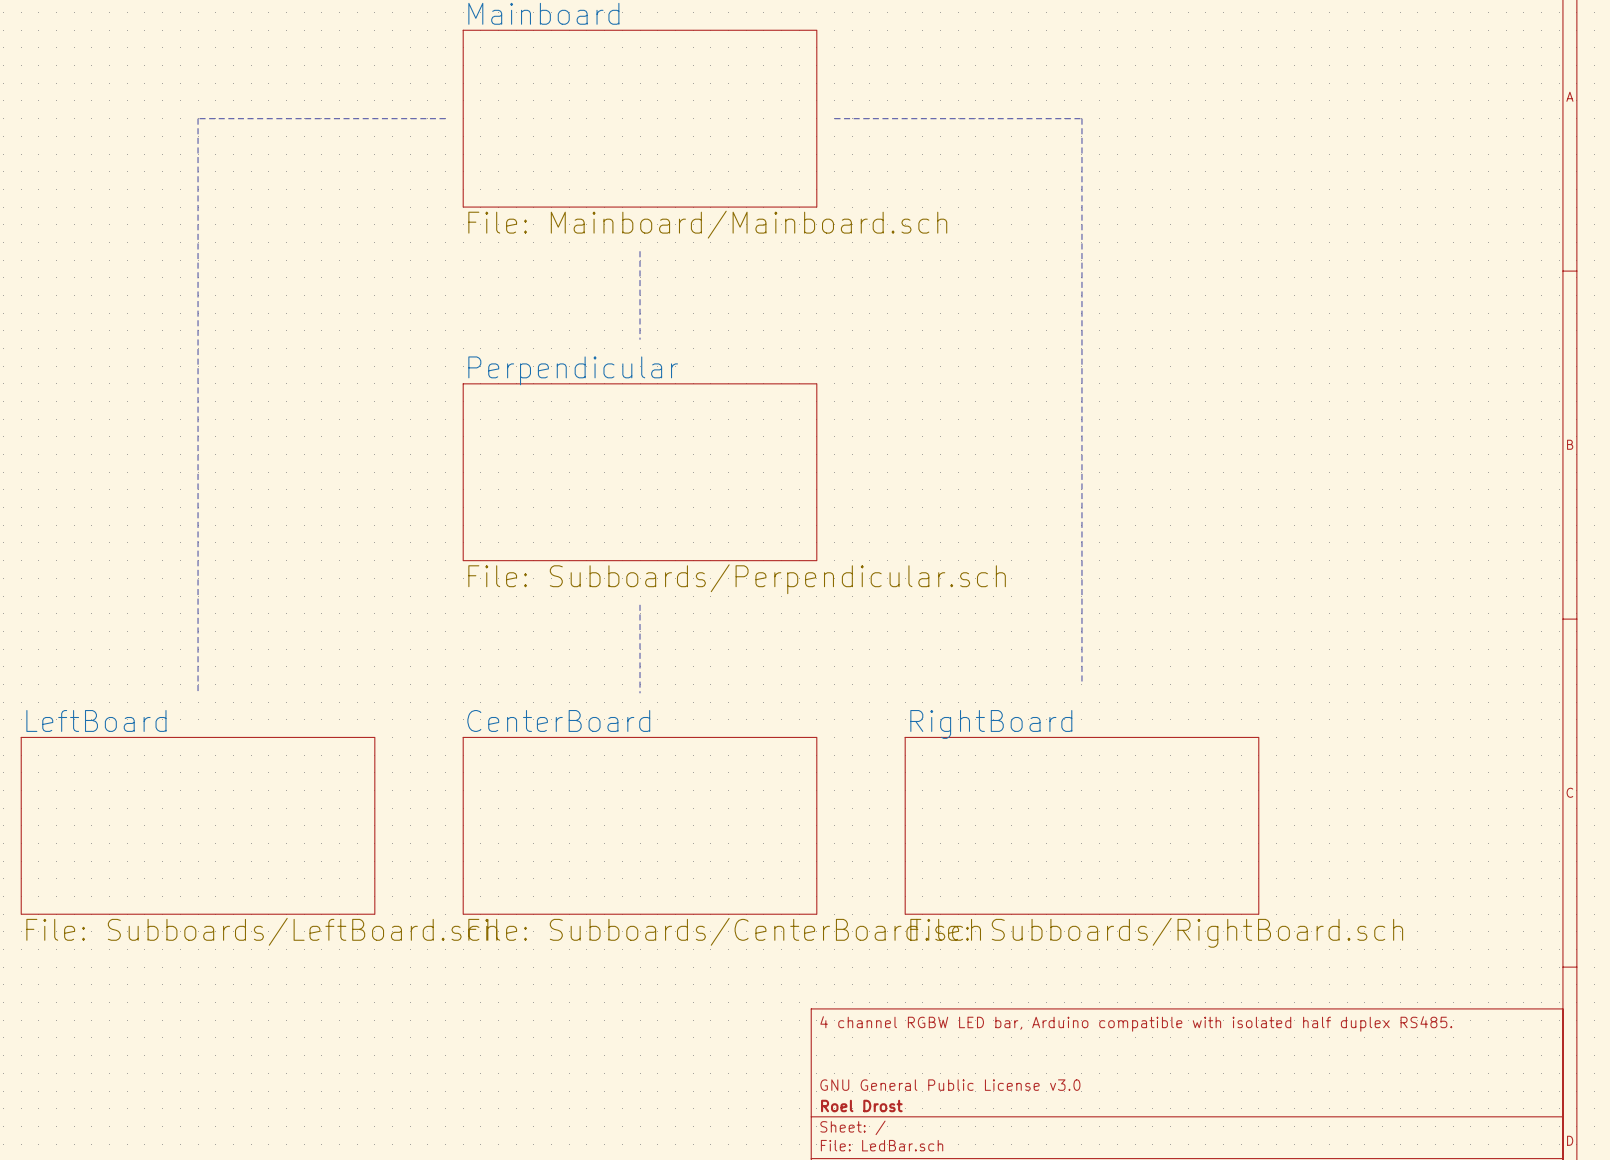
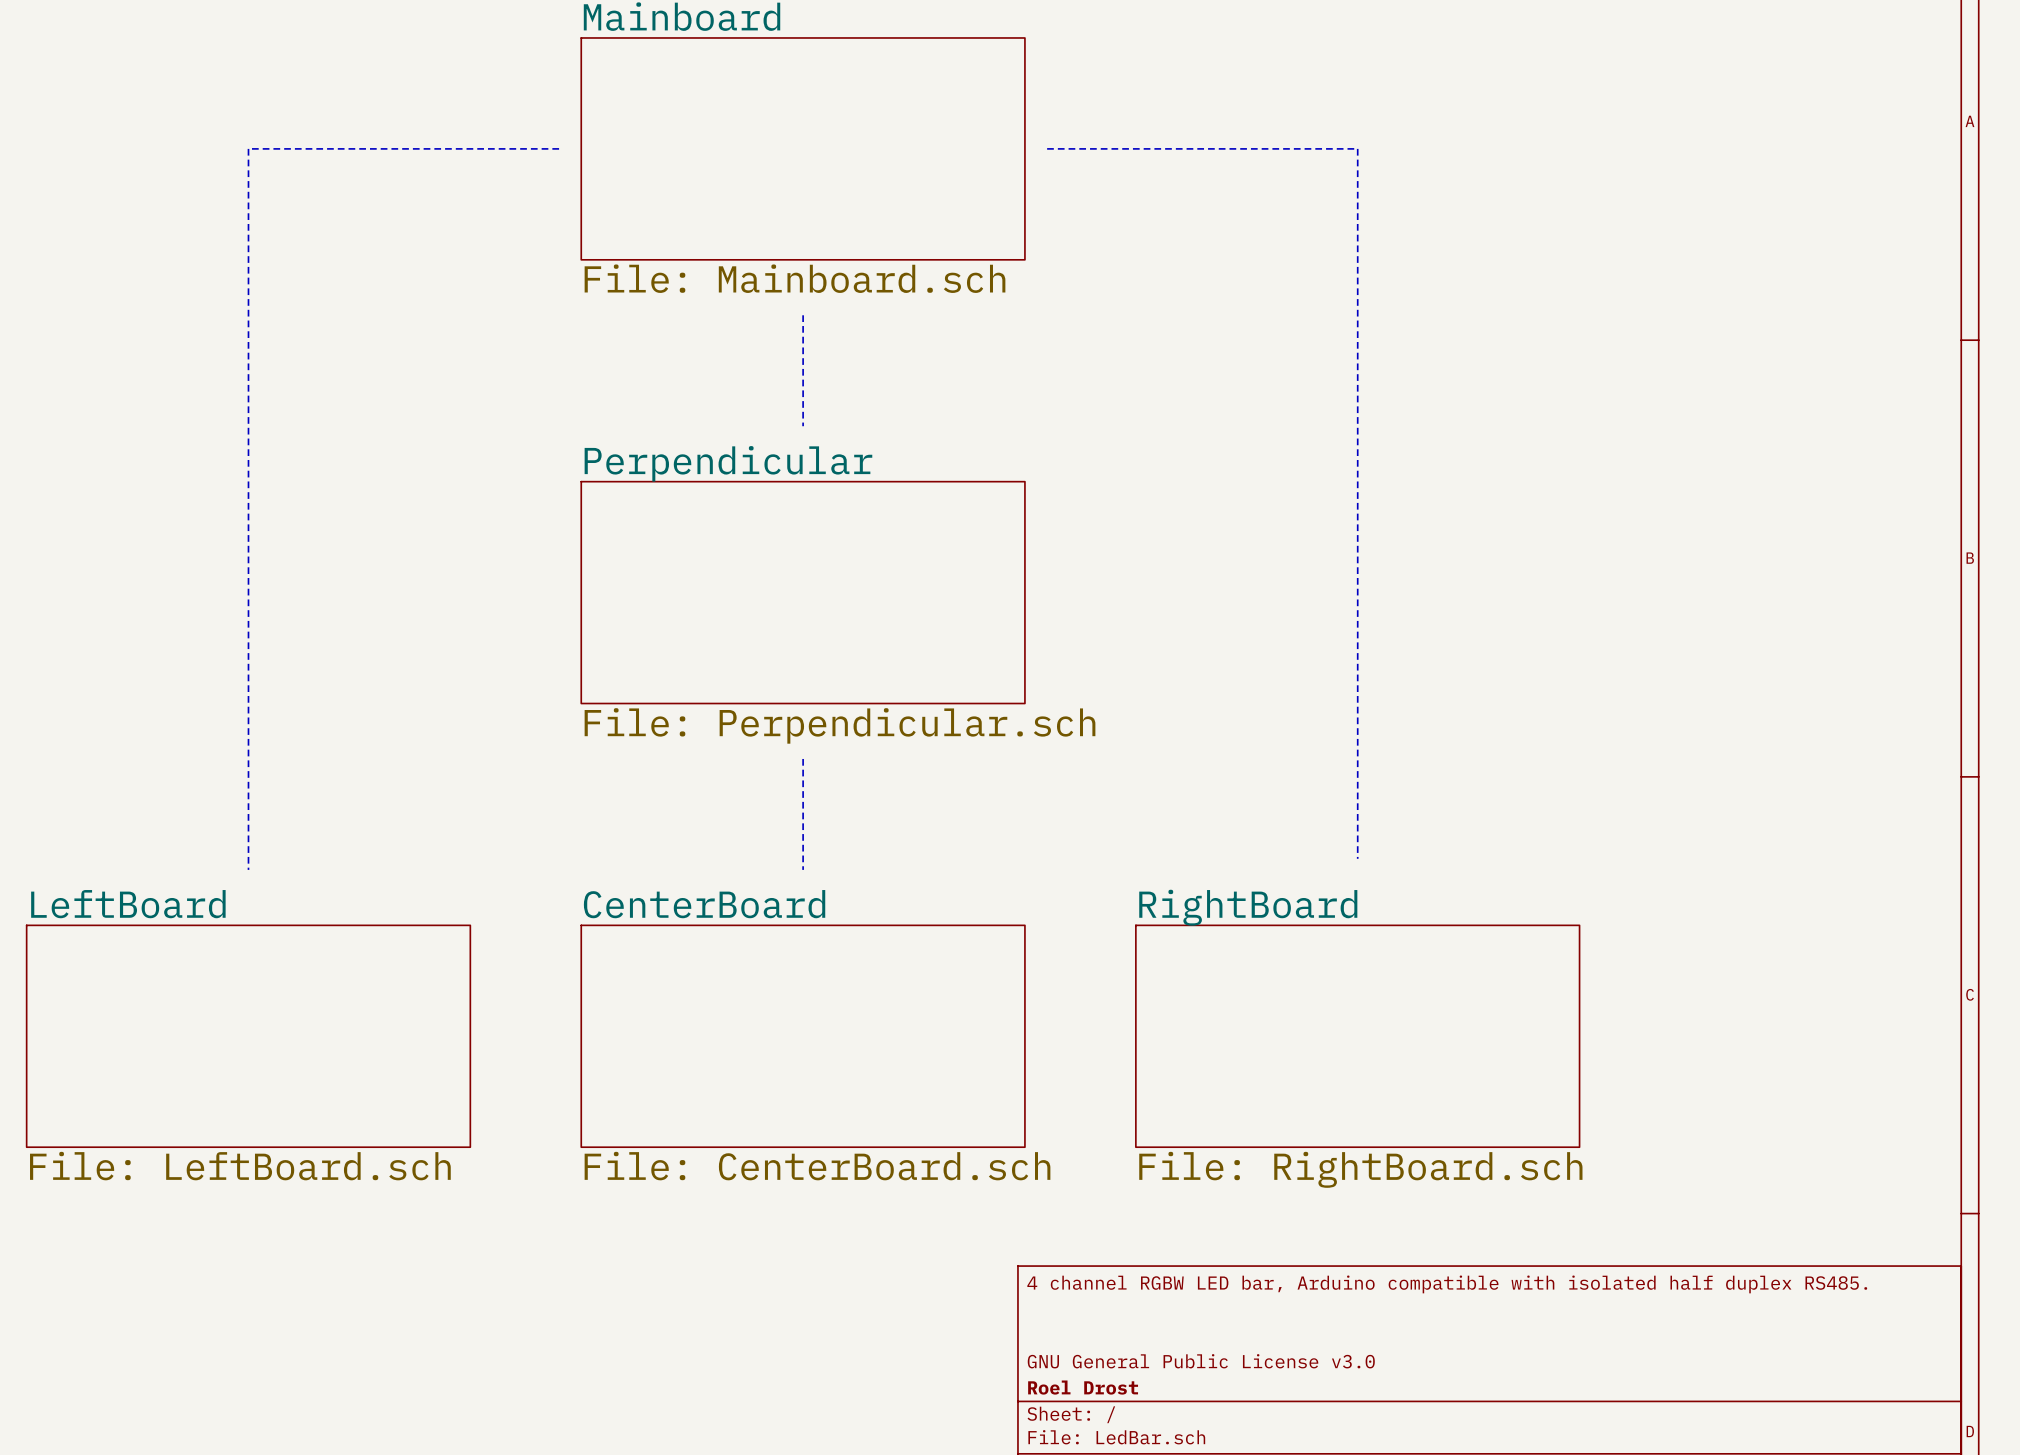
sheet Mainboard value: File: Mainboard/Mainboard.sch (707, 224) -> File: Mainboard.sch (795, 278)
sheet Perpendicular value: File: Subboards/Perpendicular.sch (737, 579) -> File: Perpendicular.sch (840, 725)
sheet LeftBoard value: File: Subboards/LeftBoard.sch (261, 931) -> File: LeftBoard.sch (240, 1166)
sheet CenterBoard value: File: Subboards/CenterBoard.sch (724, 931) -> File: CenterBoard.sch (817, 1166)
sheet RightBoard value: File: Subboards/RightBoard.sch (1156, 932) -> File: RightBoard.sch (1360, 1169)

